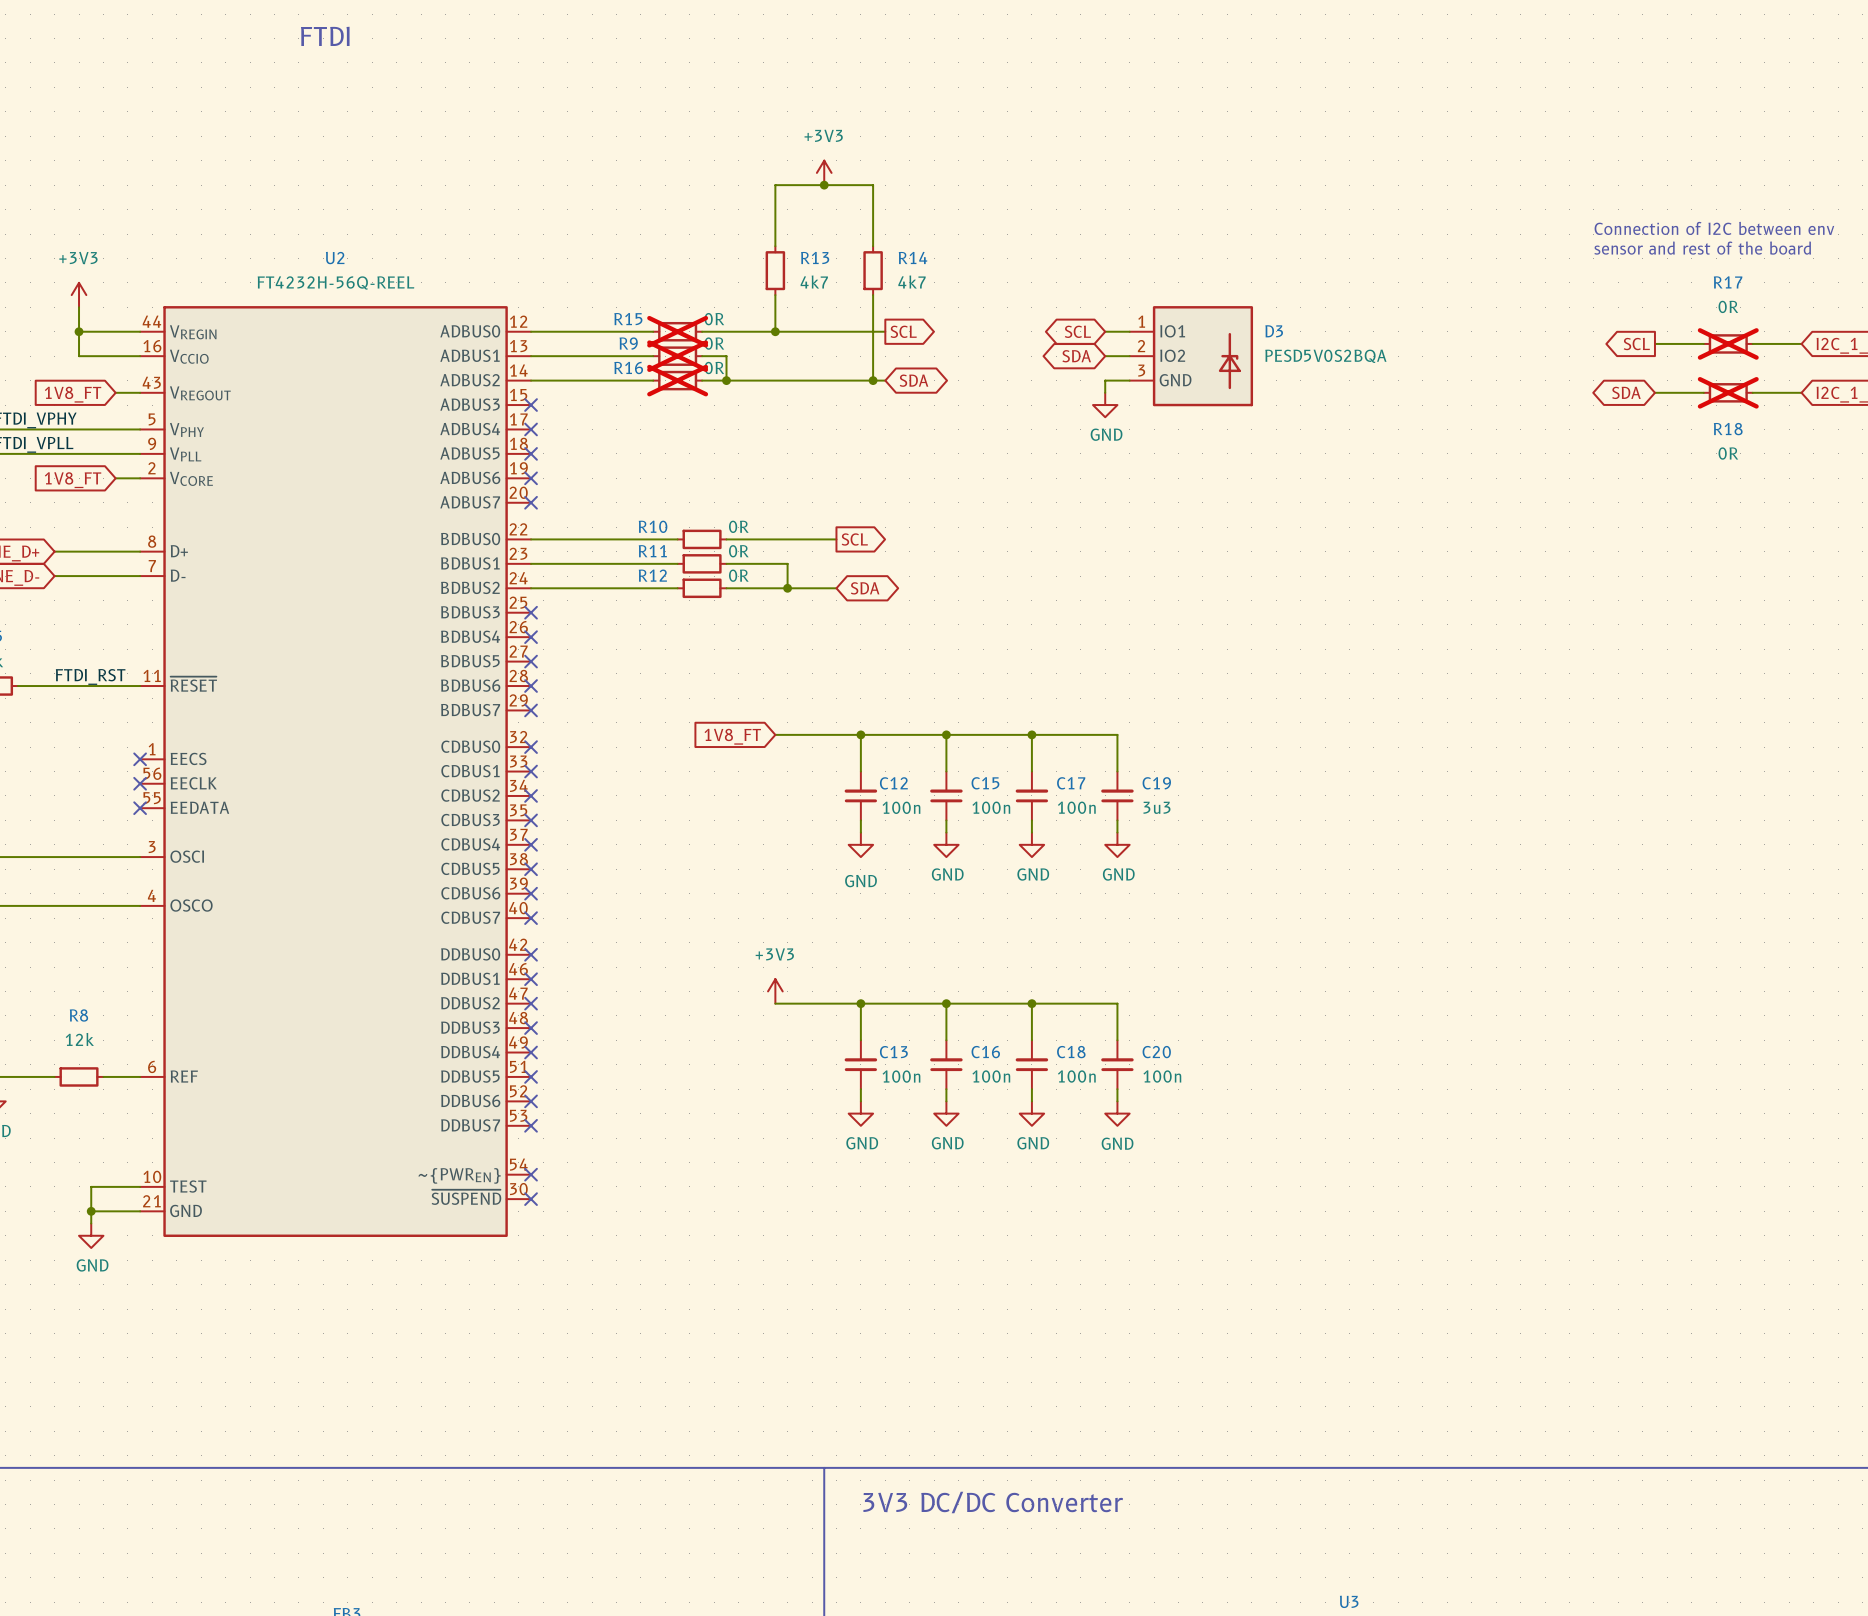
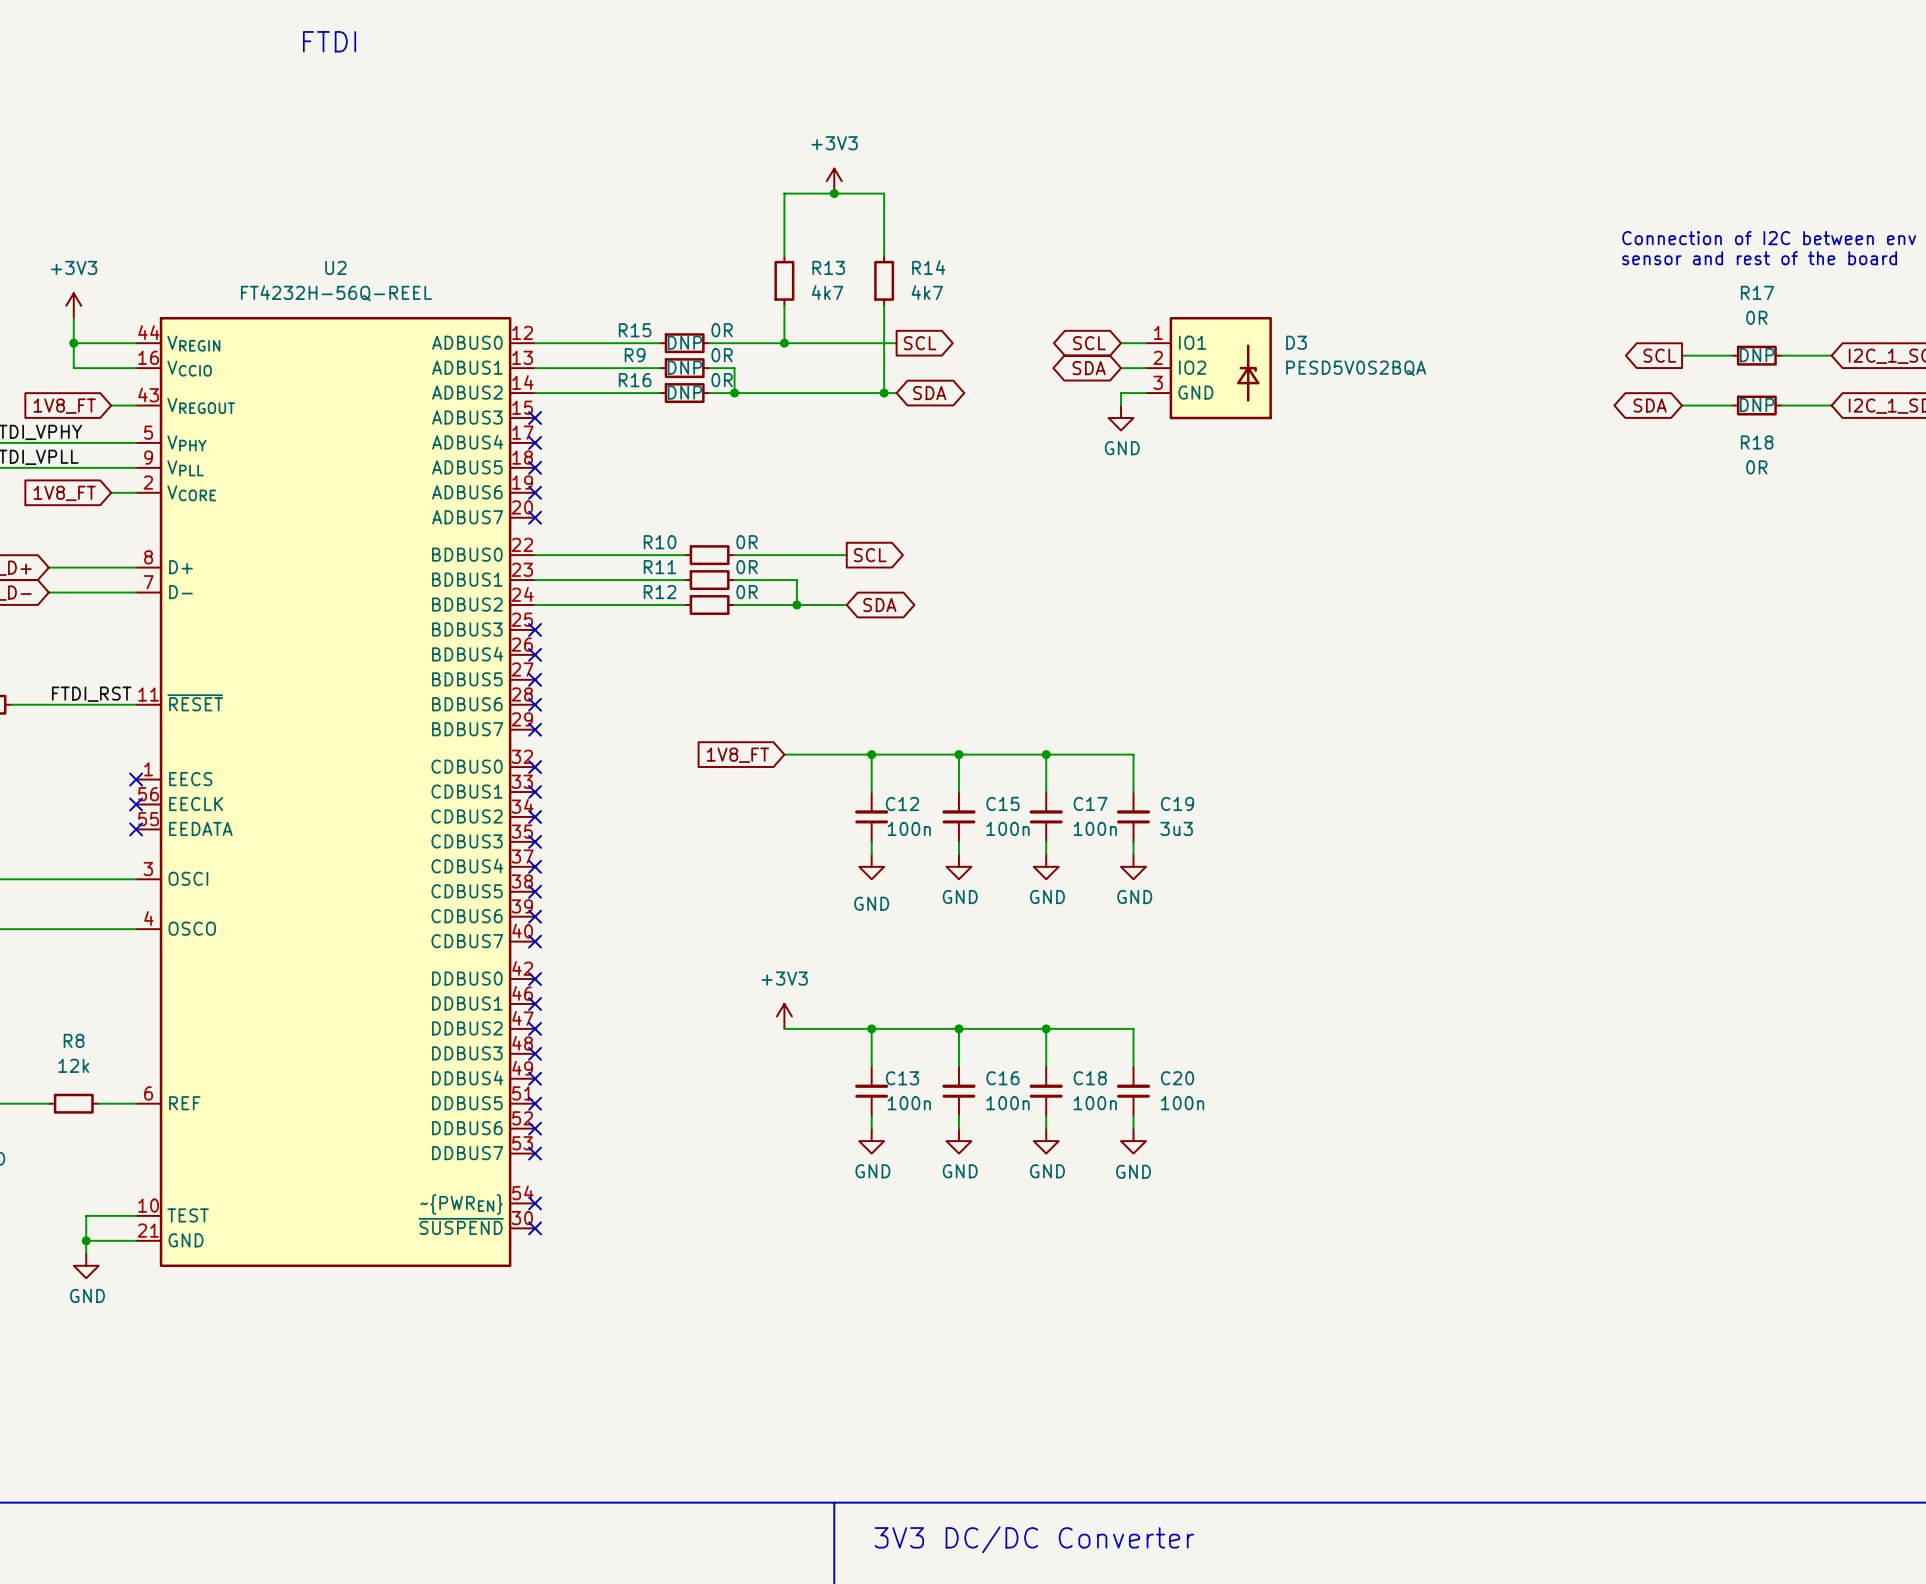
R15 do-not-place cross: (677, 331) -> none
R15 text: none -> DNP (684, 342)
R17 do-not-place cross: (1728, 343) -> none
R17 text: none -> DNP (1757, 355)
R9 text: none -> DNP (684, 367)
R9 do-not-place cross: (677, 356) -> none
R16 do-not-place cross: (677, 380) -> none
R16 text: none -> DNP (684, 392)
R18 do-not-place cross: (1728, 392) -> none
R18 text: none -> DNP (1757, 405)

